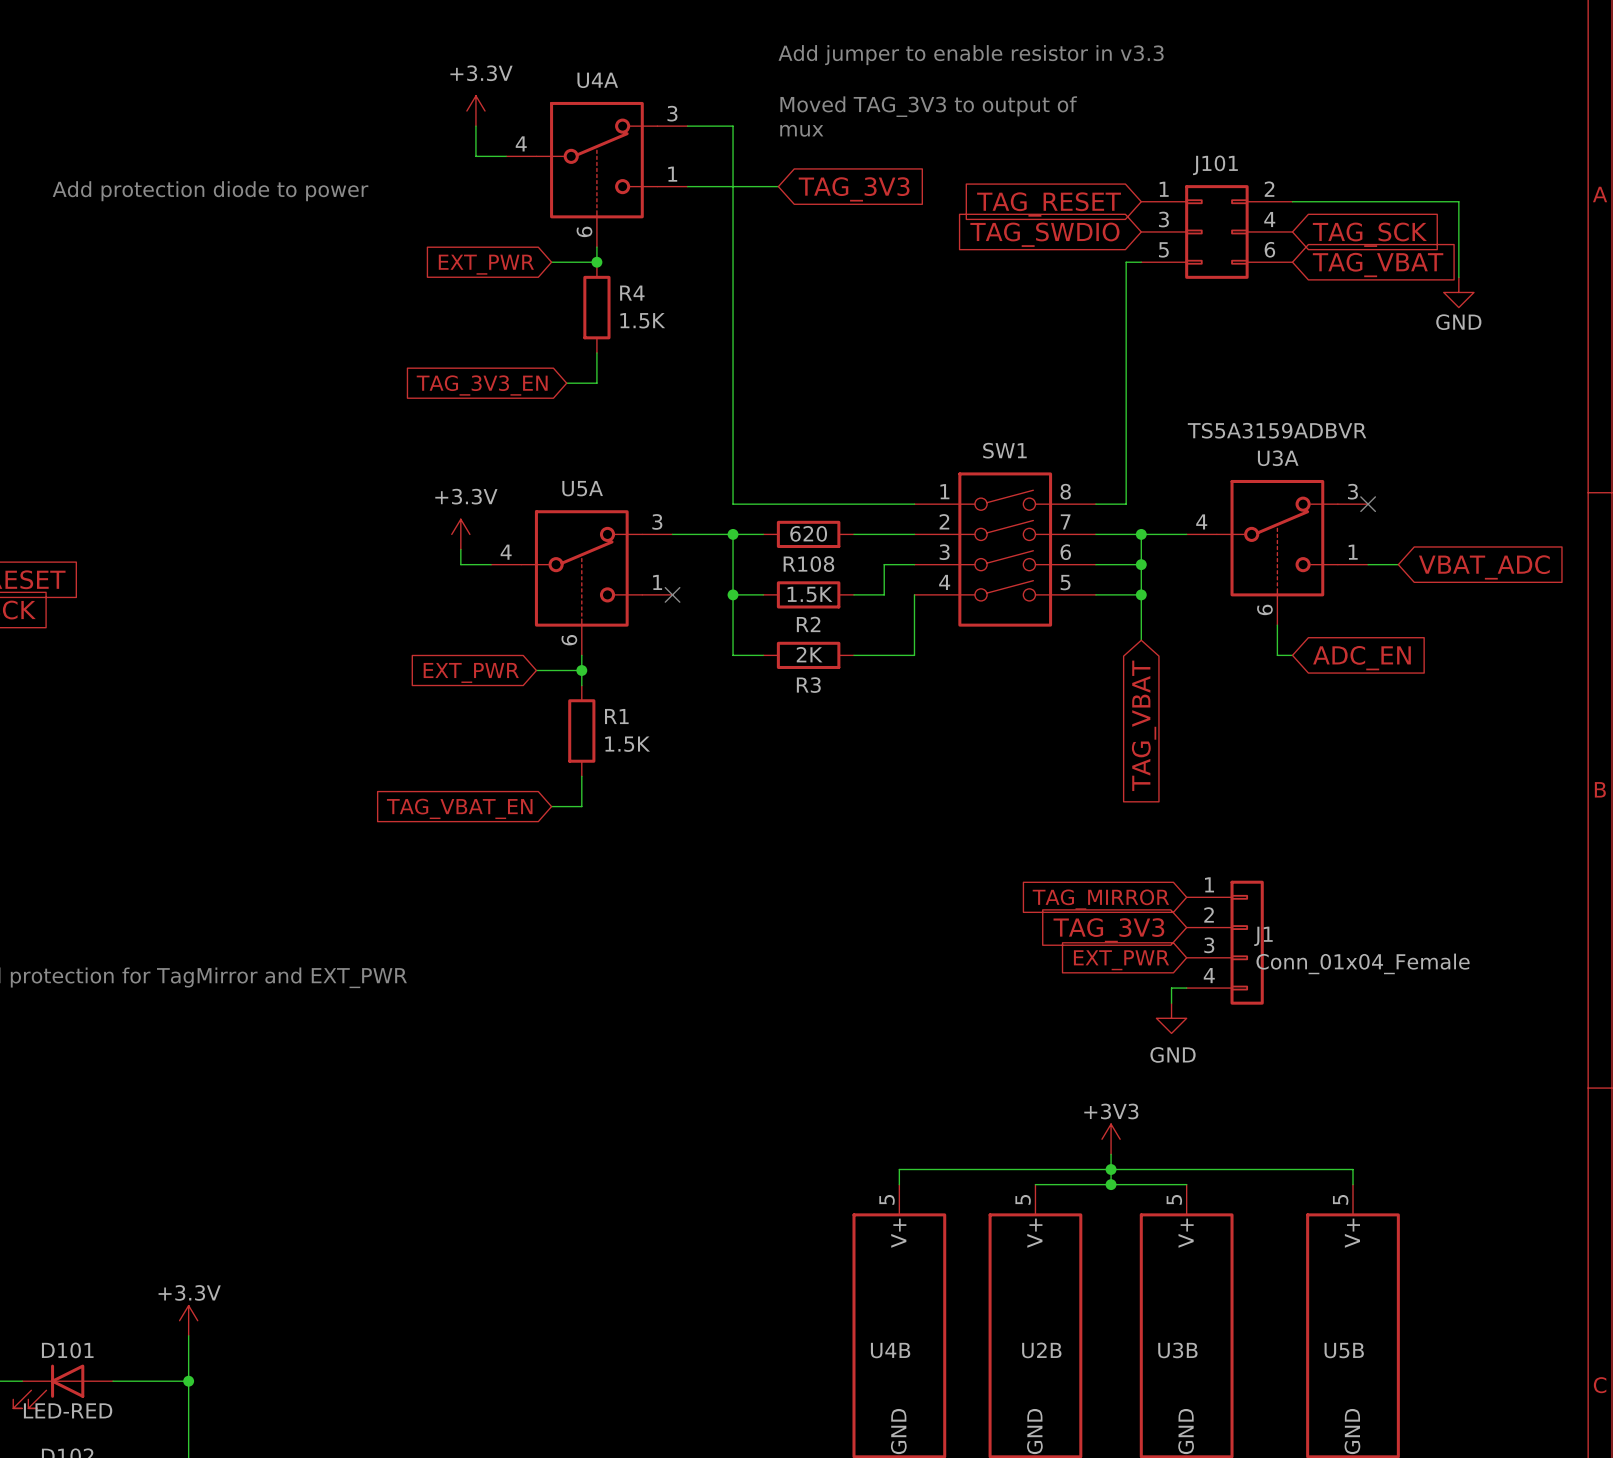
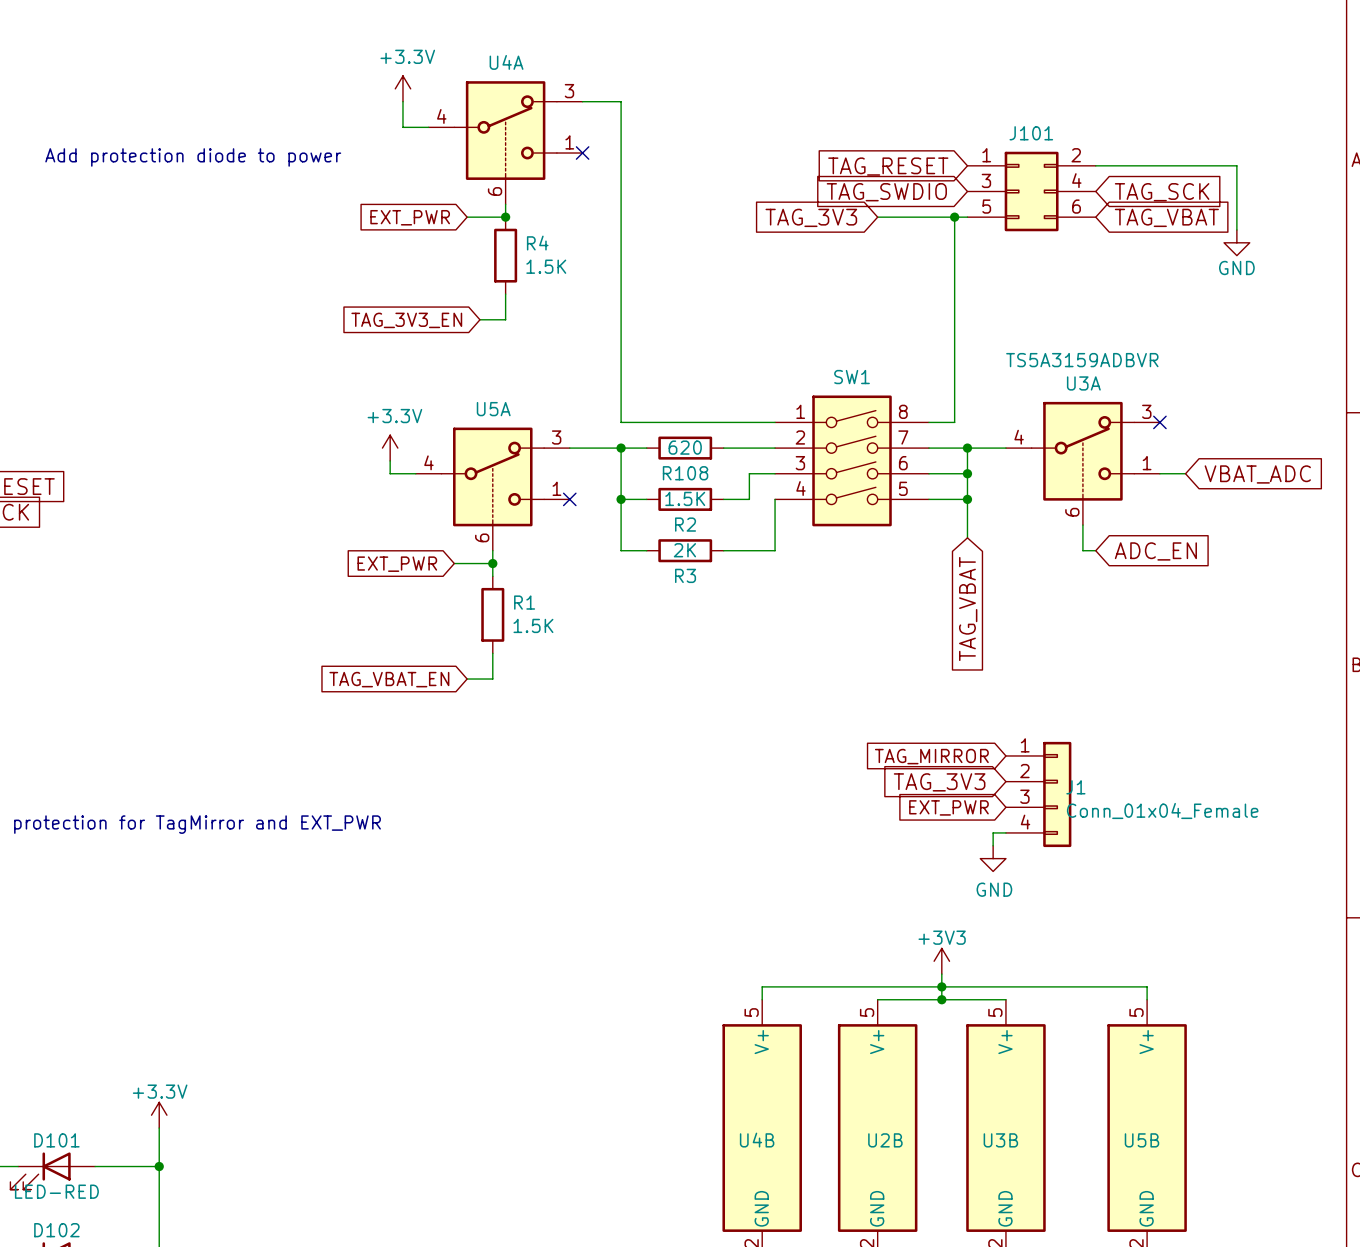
text: Add jumper to enable resistor in v3.3 (971, 55) -> none
text: Moved TAG_3V3 to output of (928, 106) -> none
text: mux (801, 130) -> none
wire: (687, 186) (778, 186) -> none
no-connect mark: none -> (582, 153)
global label rotation: 0° (854, 189) -> 180° (811, 217)
wire: none -> (877, 217) (954, 217)
junction: none -> (954, 217)

